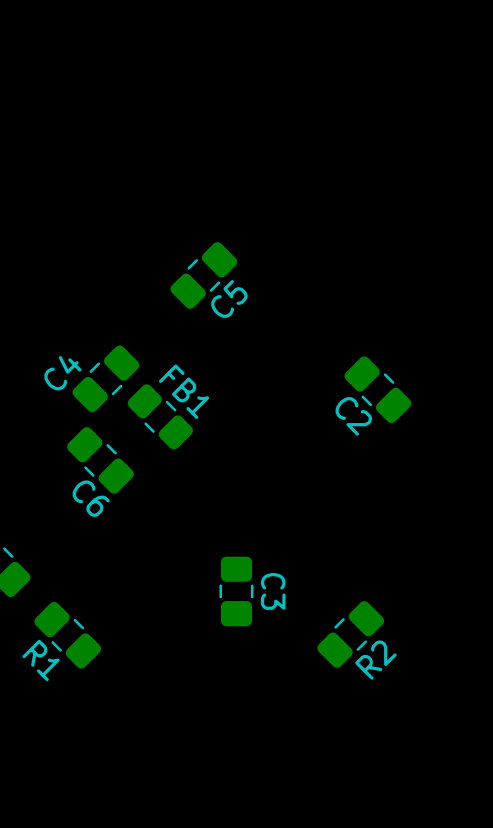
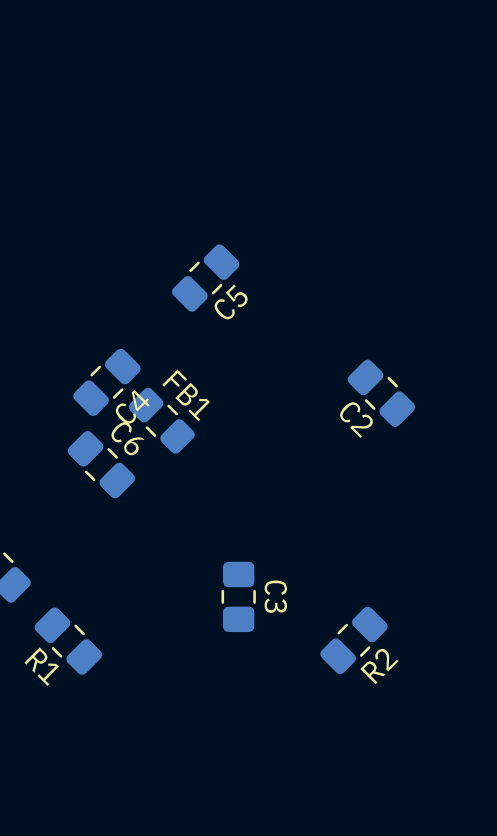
C4 name position: C4 (62, 373) -> C4 (132, 407)
C6 name position: C6 (91, 498) -> C6 (127, 438)

